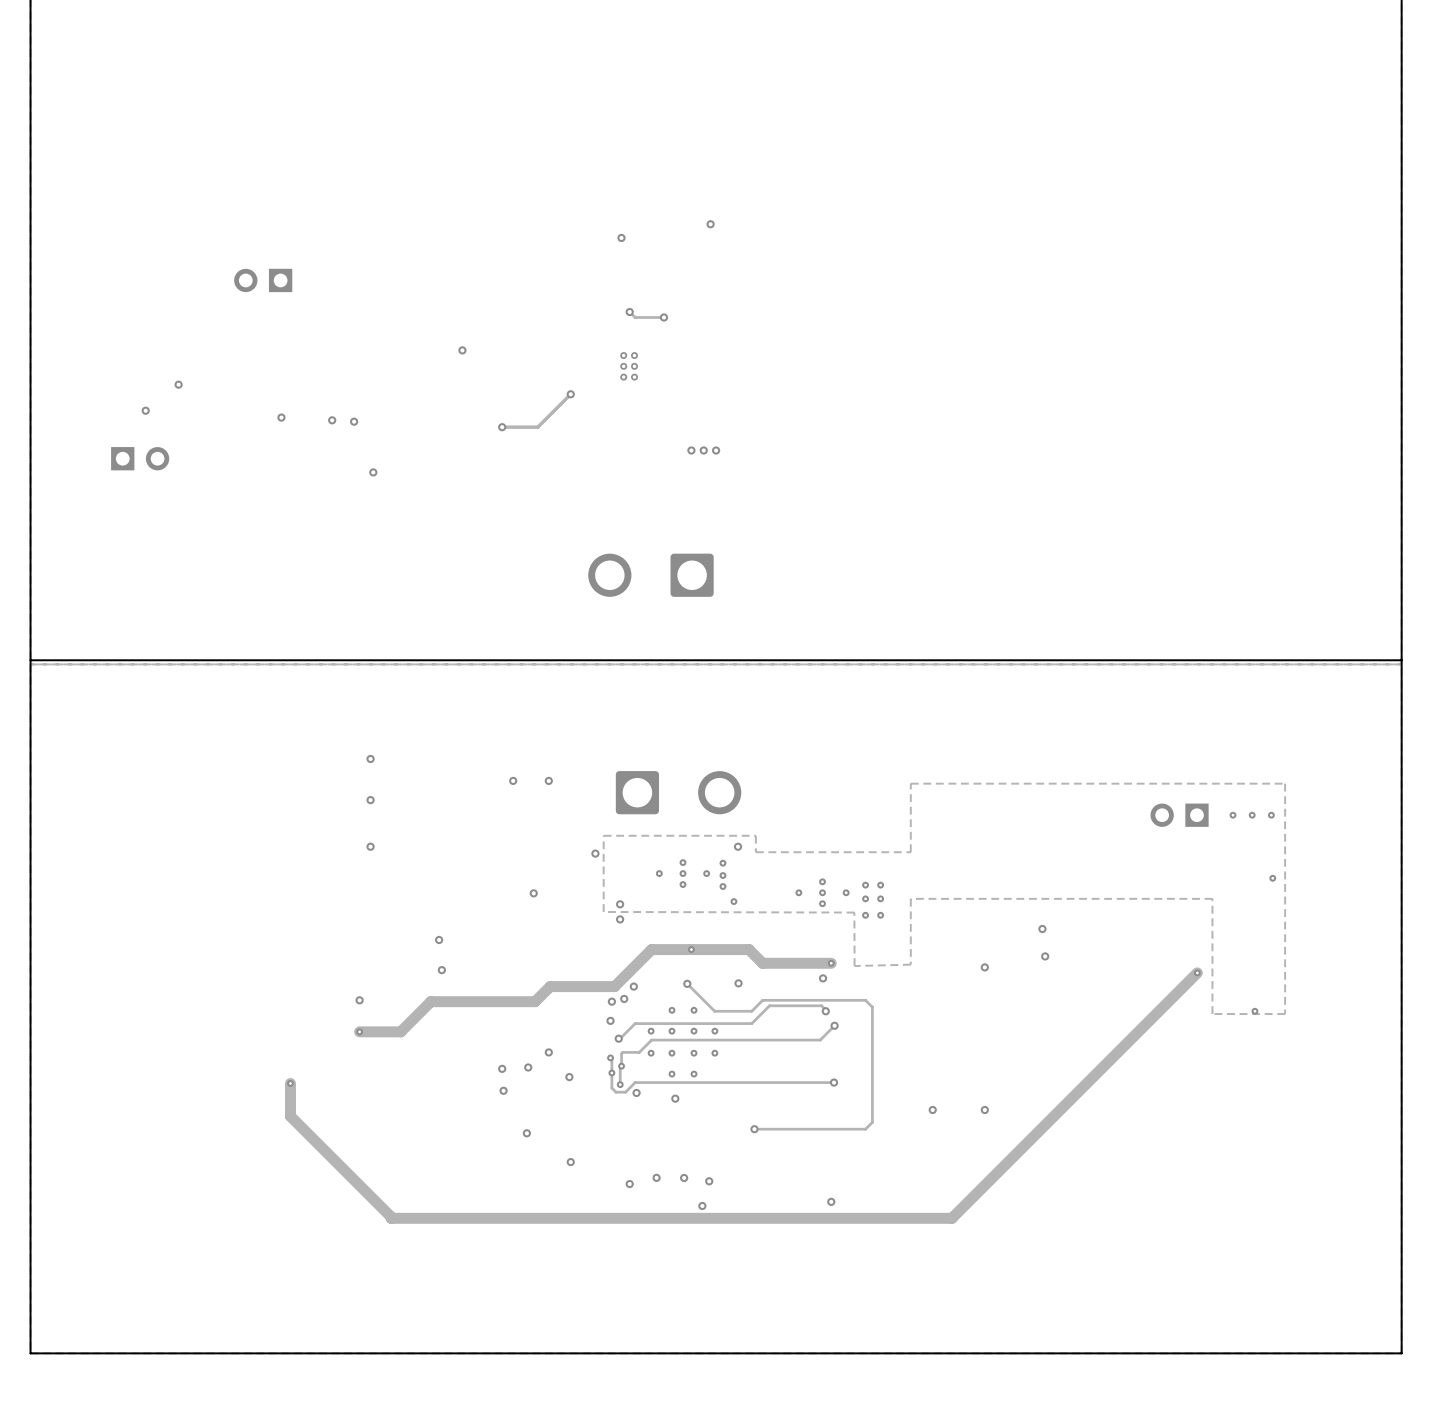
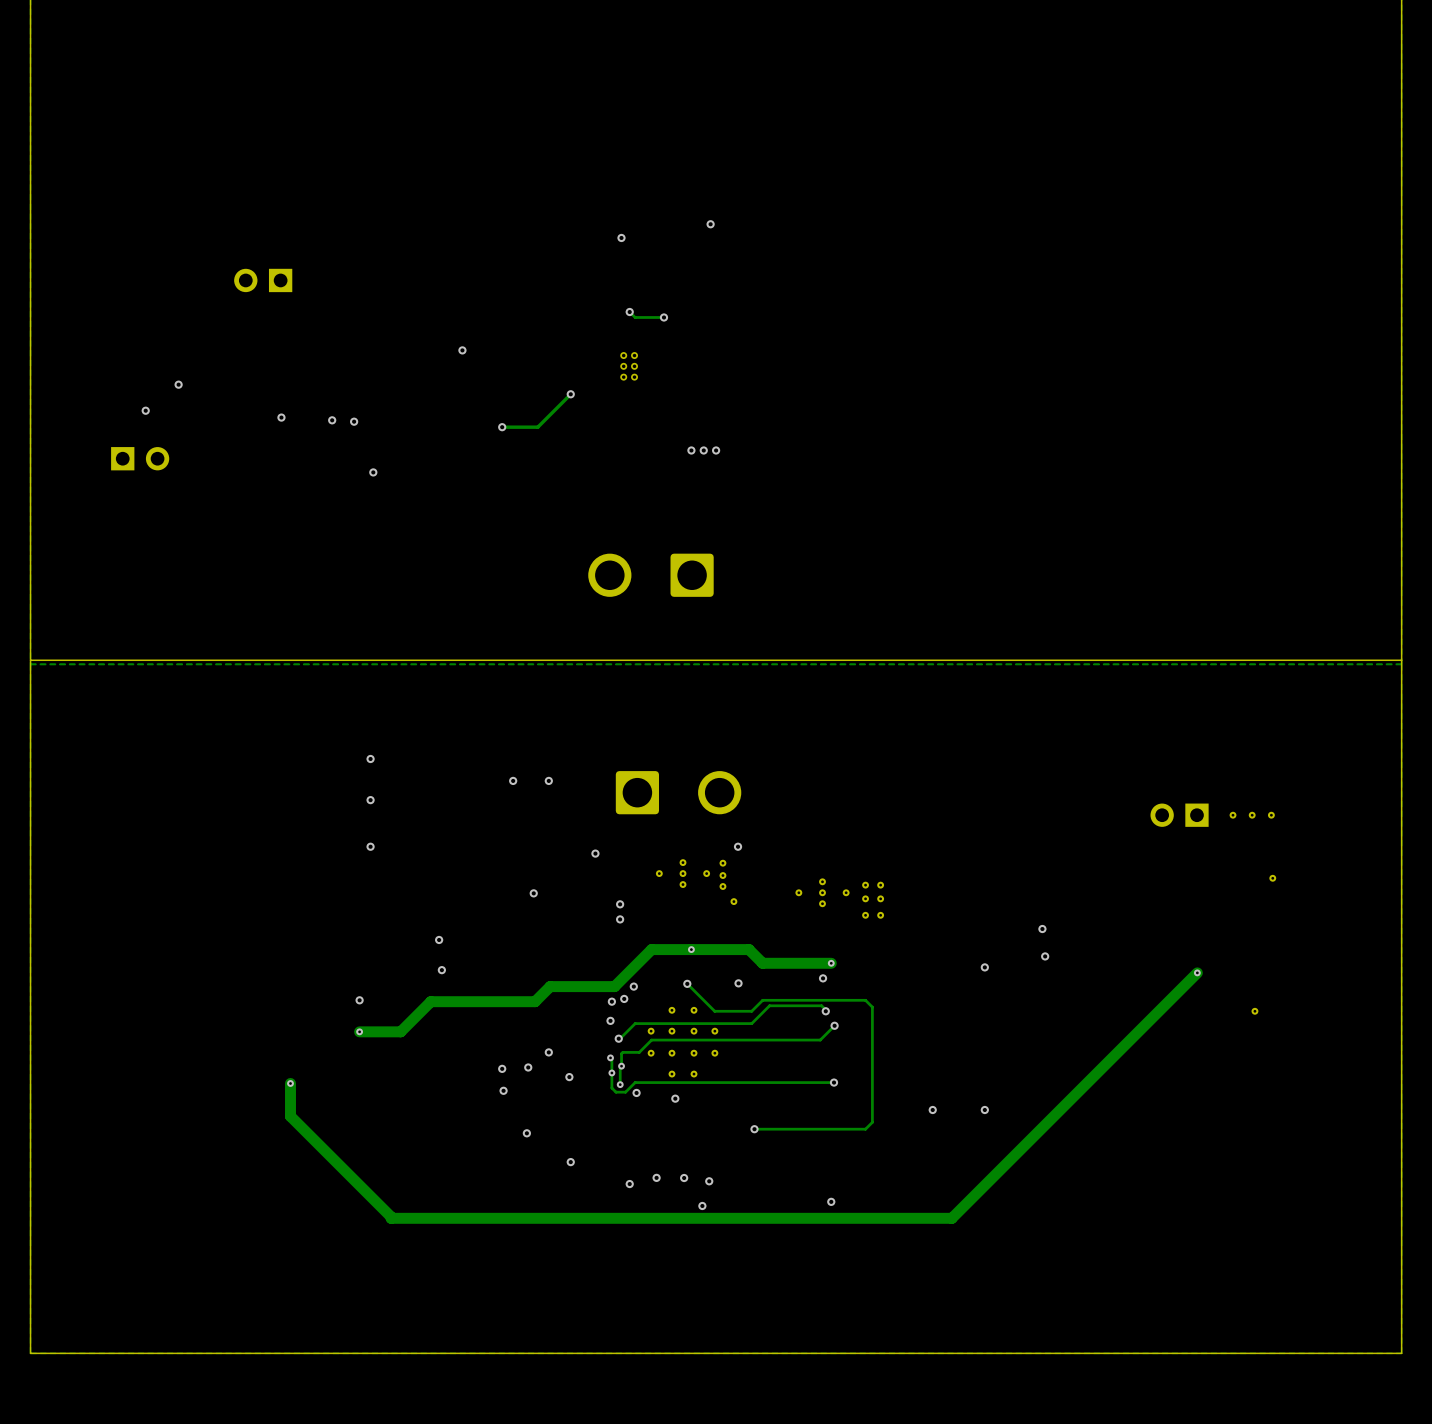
zone outline: (1285, 783) (1285, 1014) (1212, 1014) (1212, 898) (910, 898) (910, 964) (854, 966) (854, 912) (603, 911) (603, 835) (755, 835) (755, 852) (910, 852) (910, 783) (1285, 783) -> none

